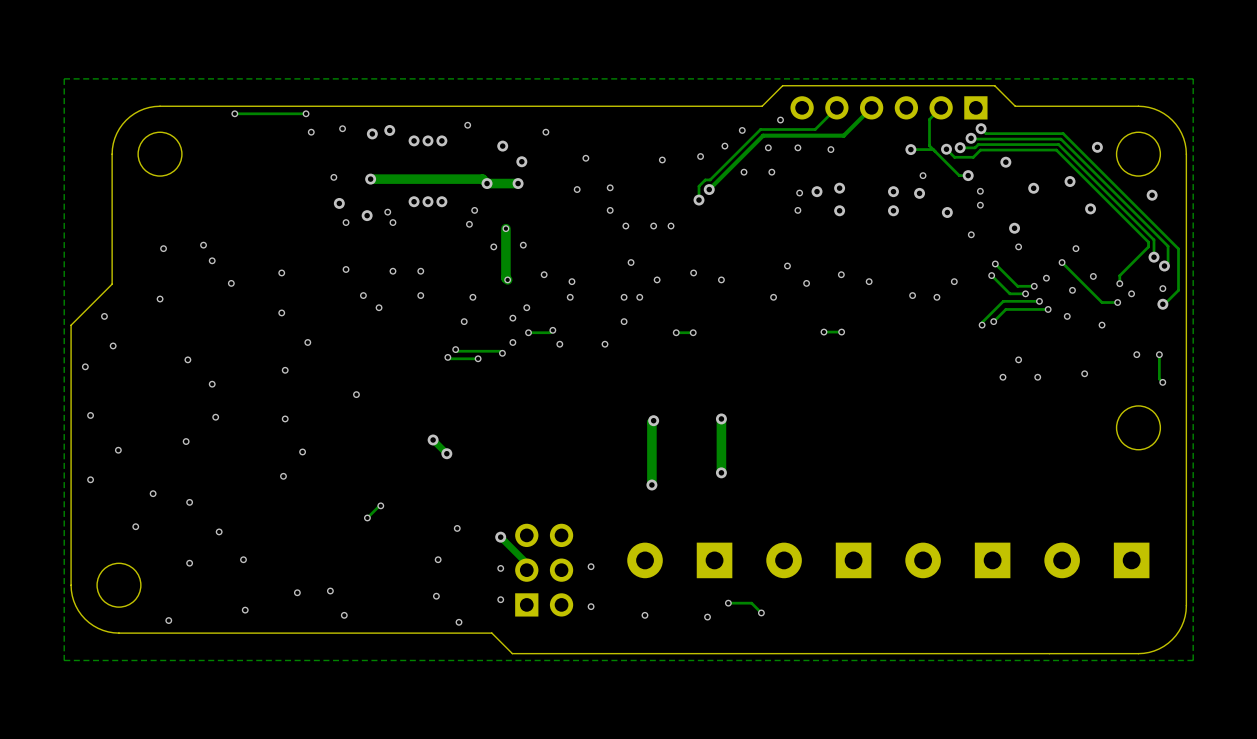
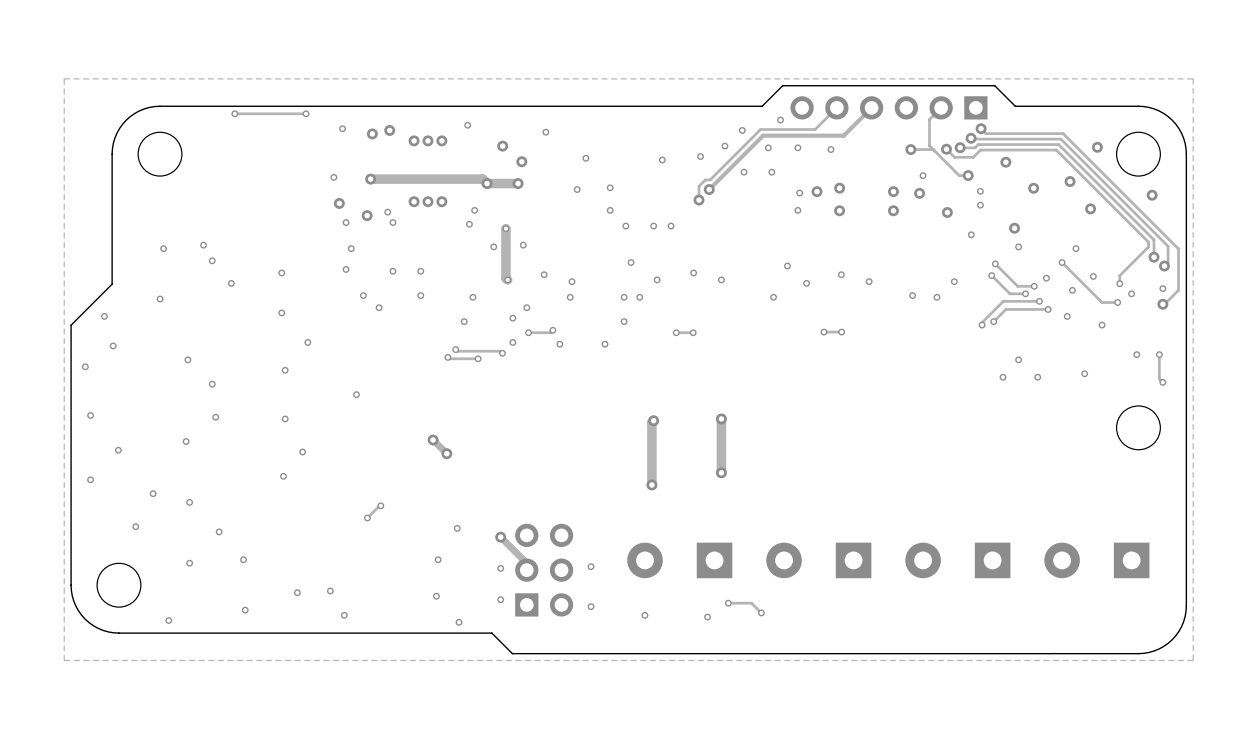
via: (311, 132) -> none
via: none -> (351, 248)

